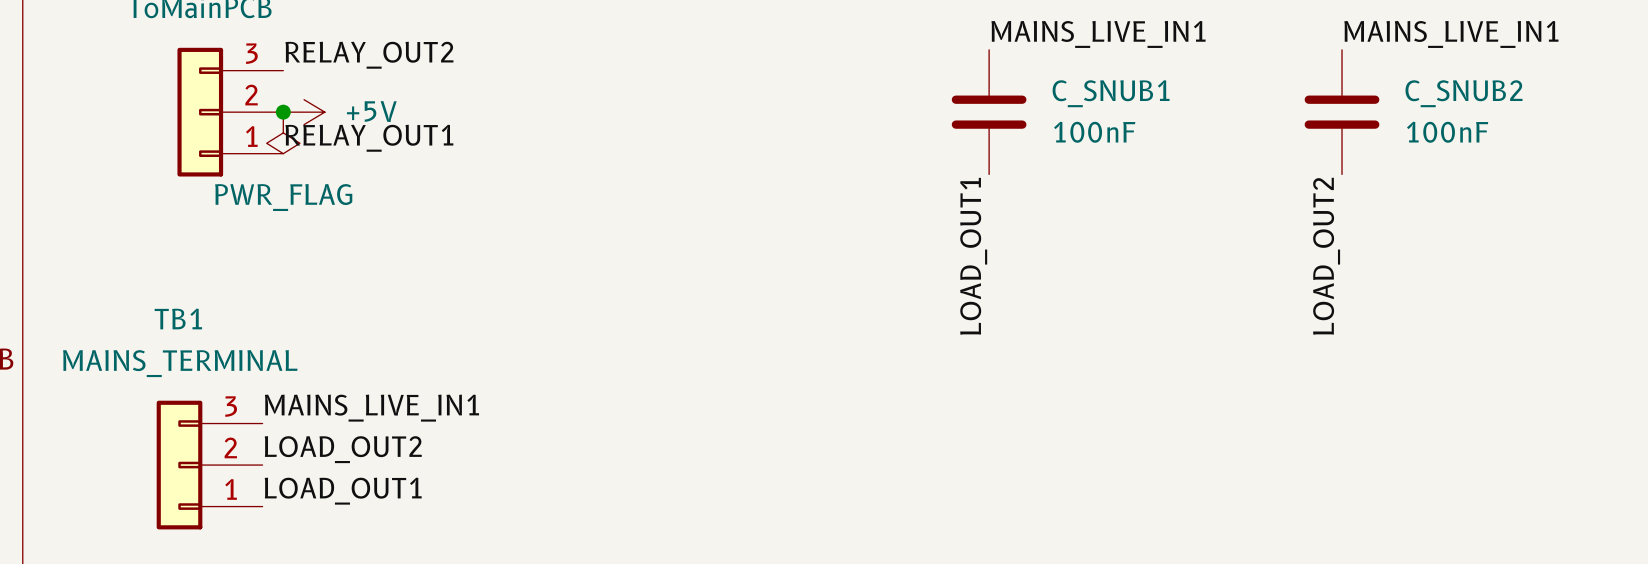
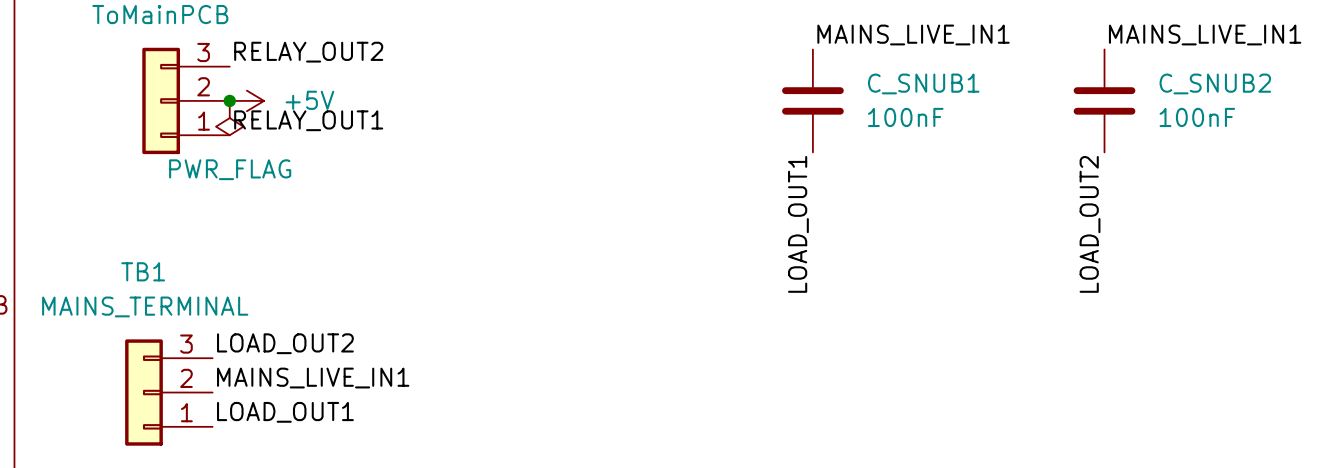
label: MAINS_LIVE_IN1 (371, 408) -> LOAD_OUT2 (285, 343)
label: LOAD_OUT2 (343, 449) -> MAINS_LIVE_IN1 (313, 378)

